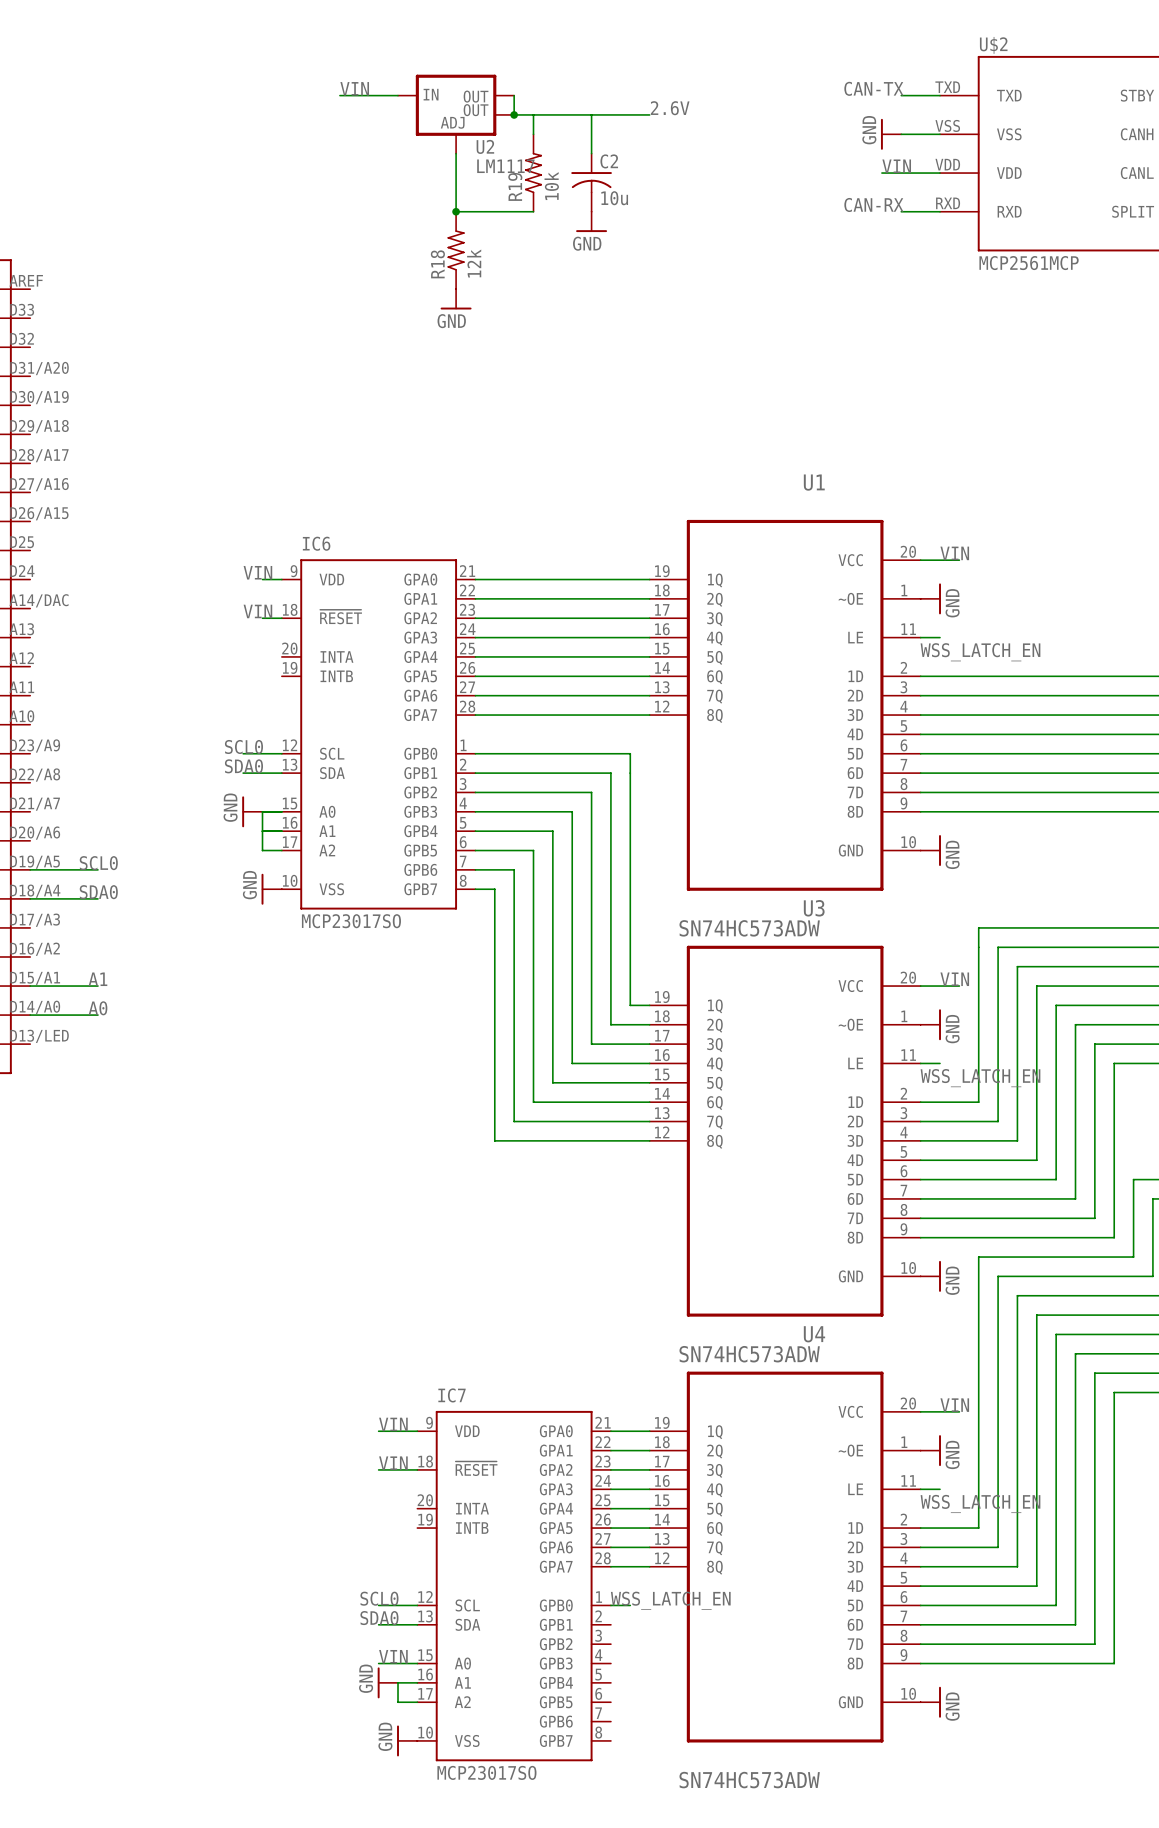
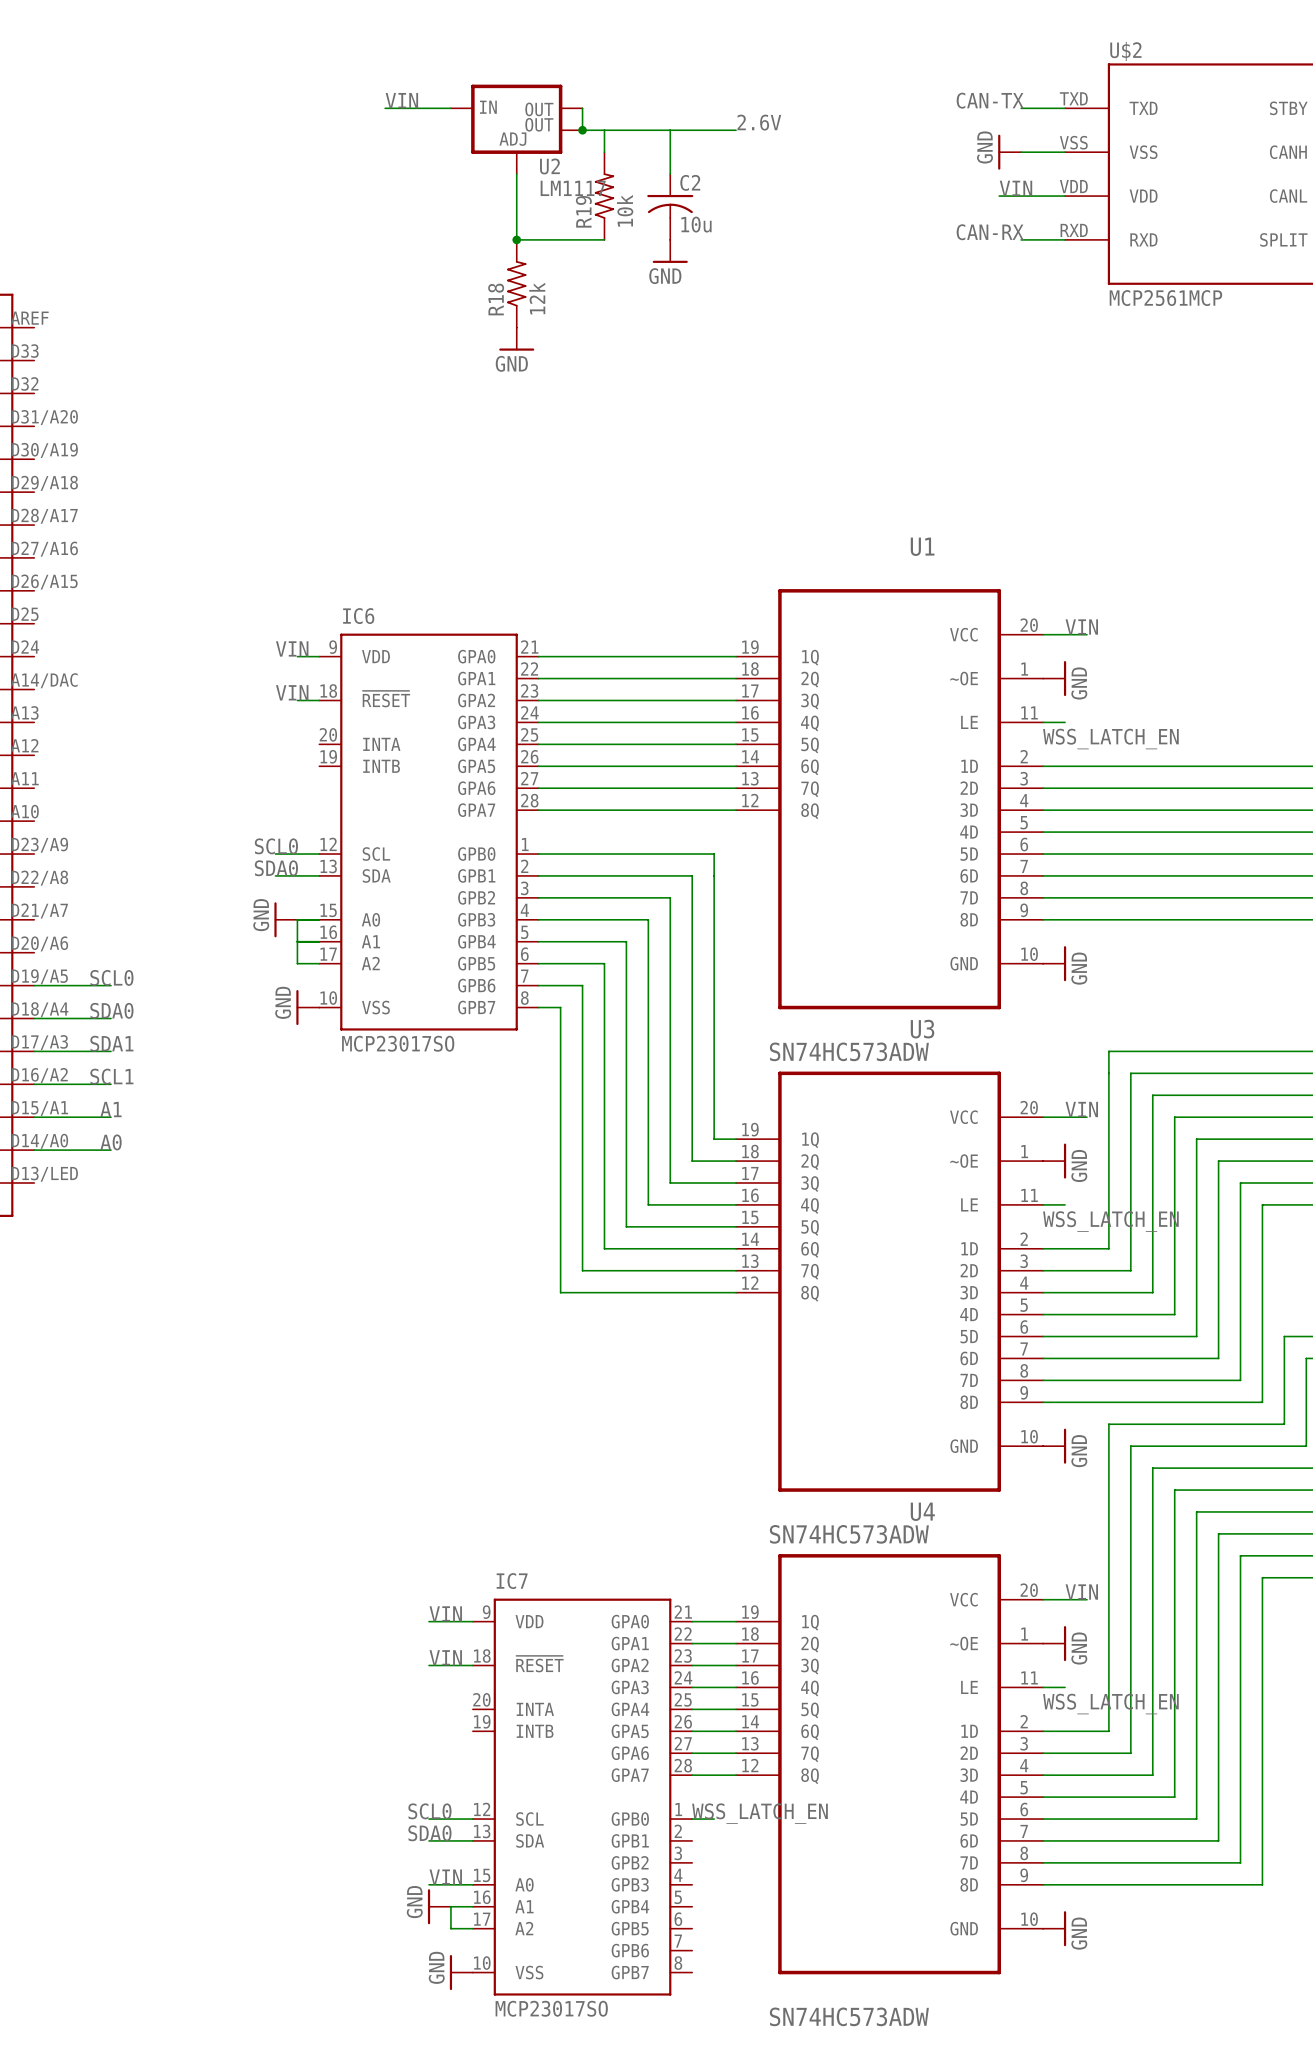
label: none -> SDA1 (111, 1043)
wire: none -> (34, 1051) (111, 1051)
label: none -> SCL1 (111, 1076)
wire: none -> (34, 1084) (111, 1084)

